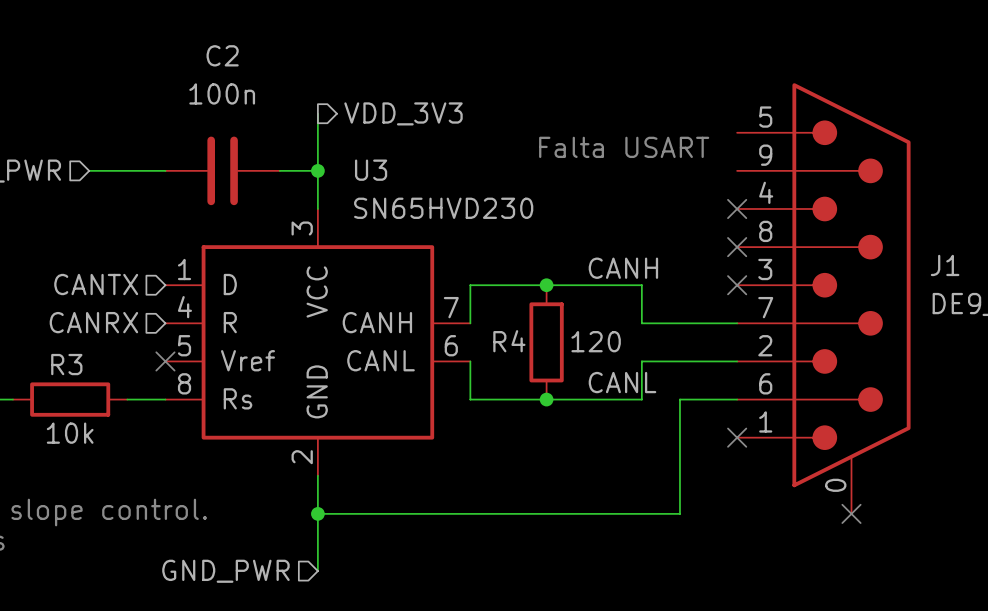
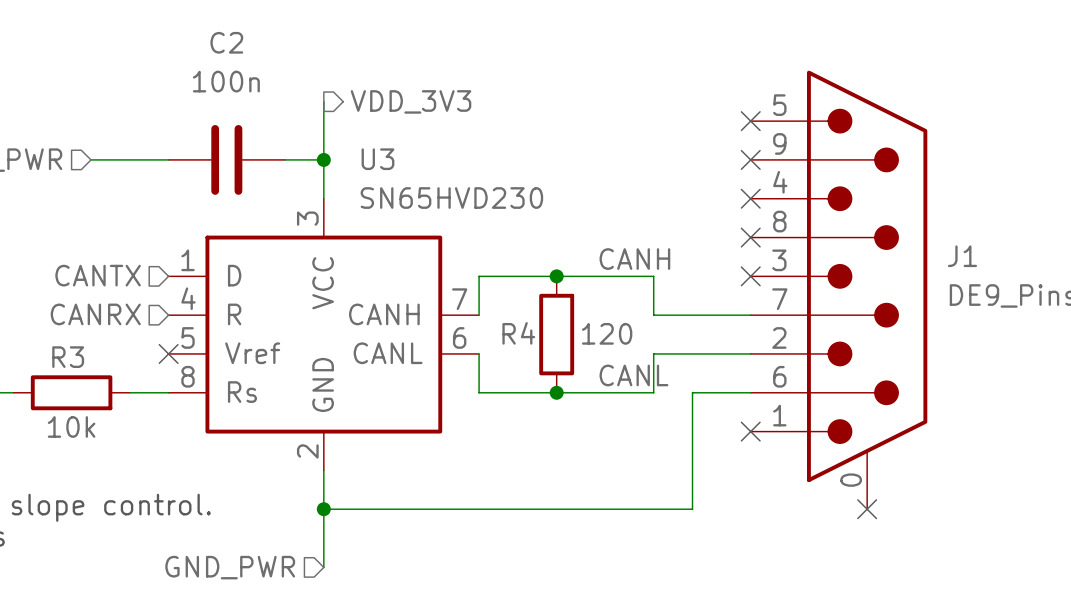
no-connect mark: none -> (750, 121)
text: Falta USART (624, 147) -> none
no-connect mark: none -> (750, 159)

